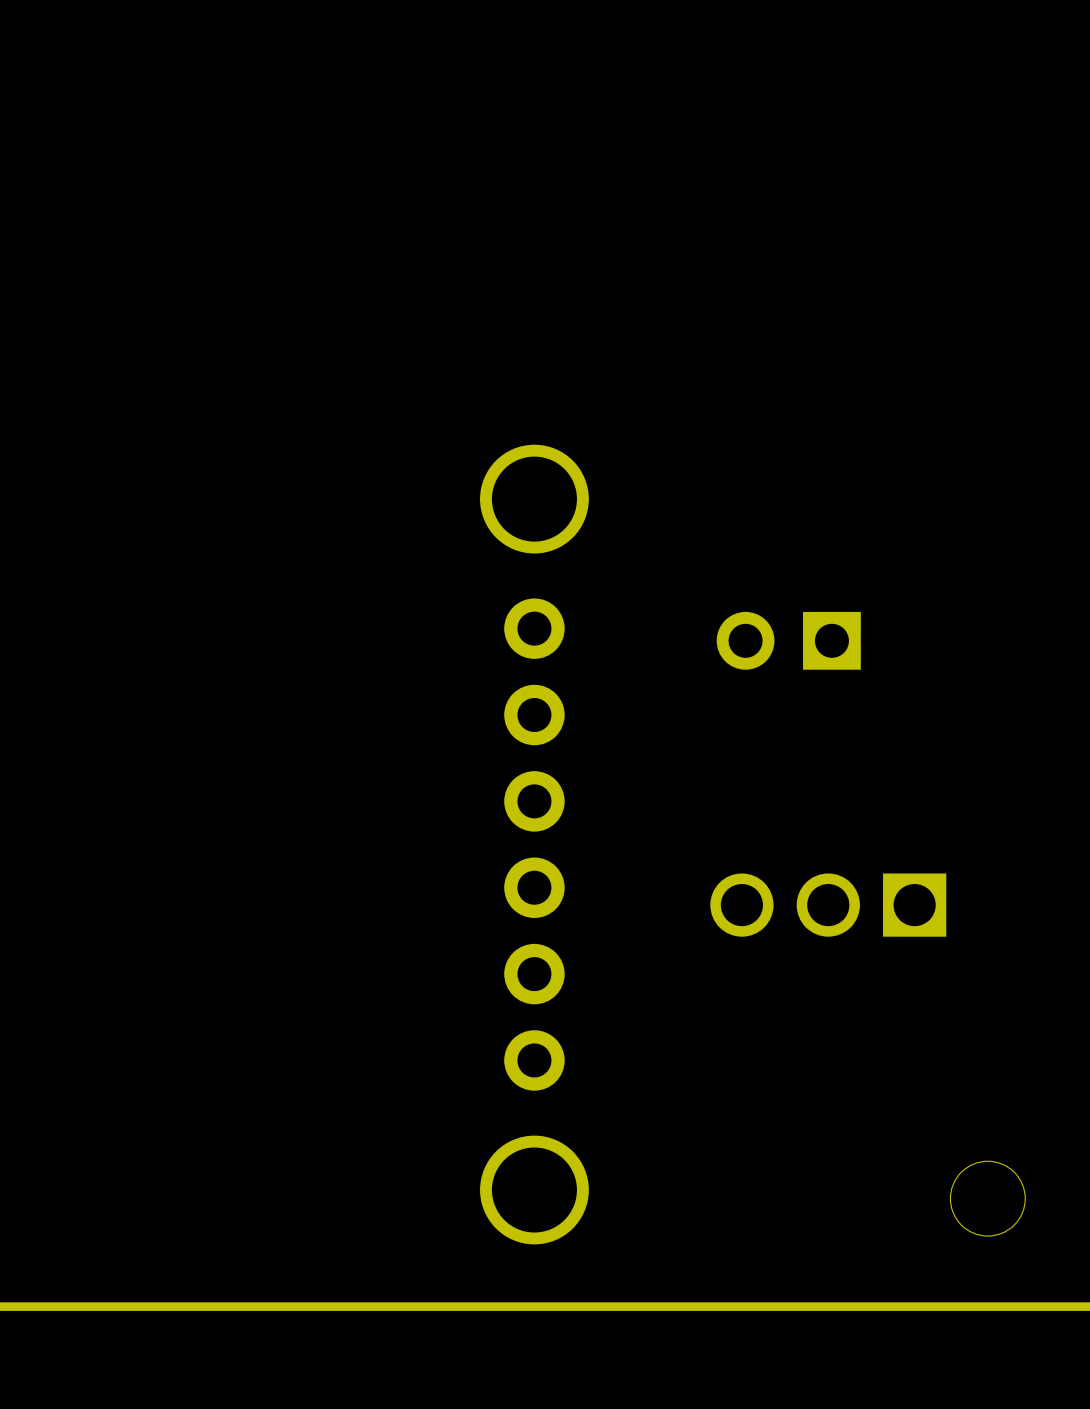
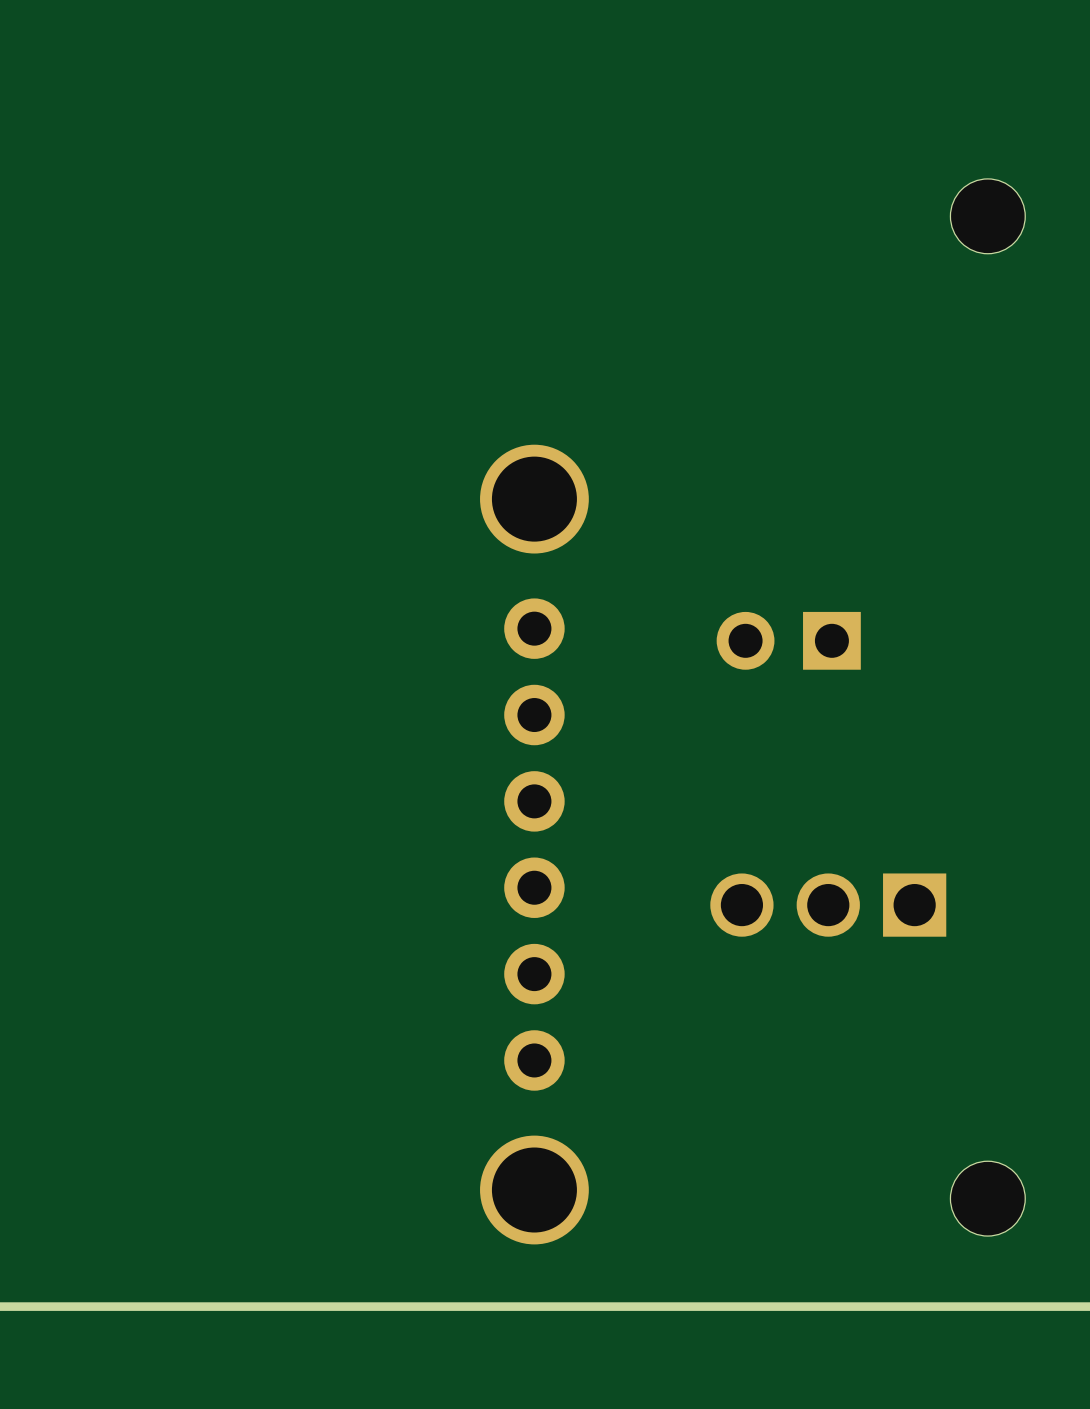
part: none -> (987, 216)

